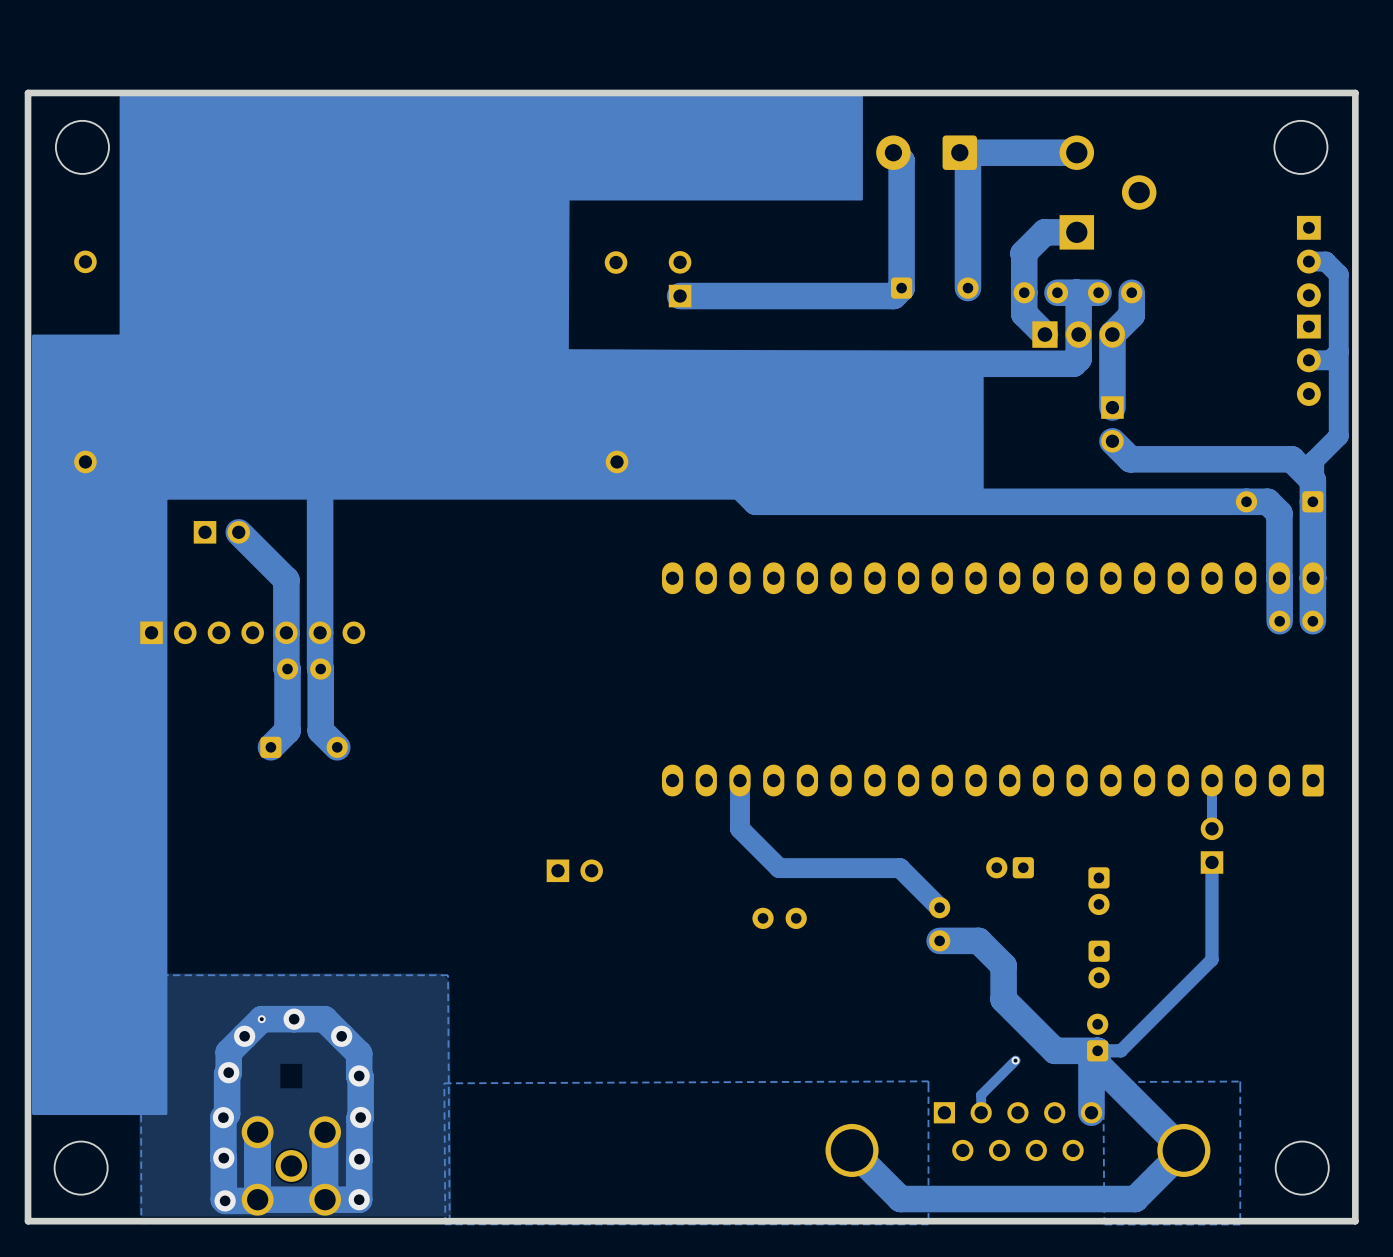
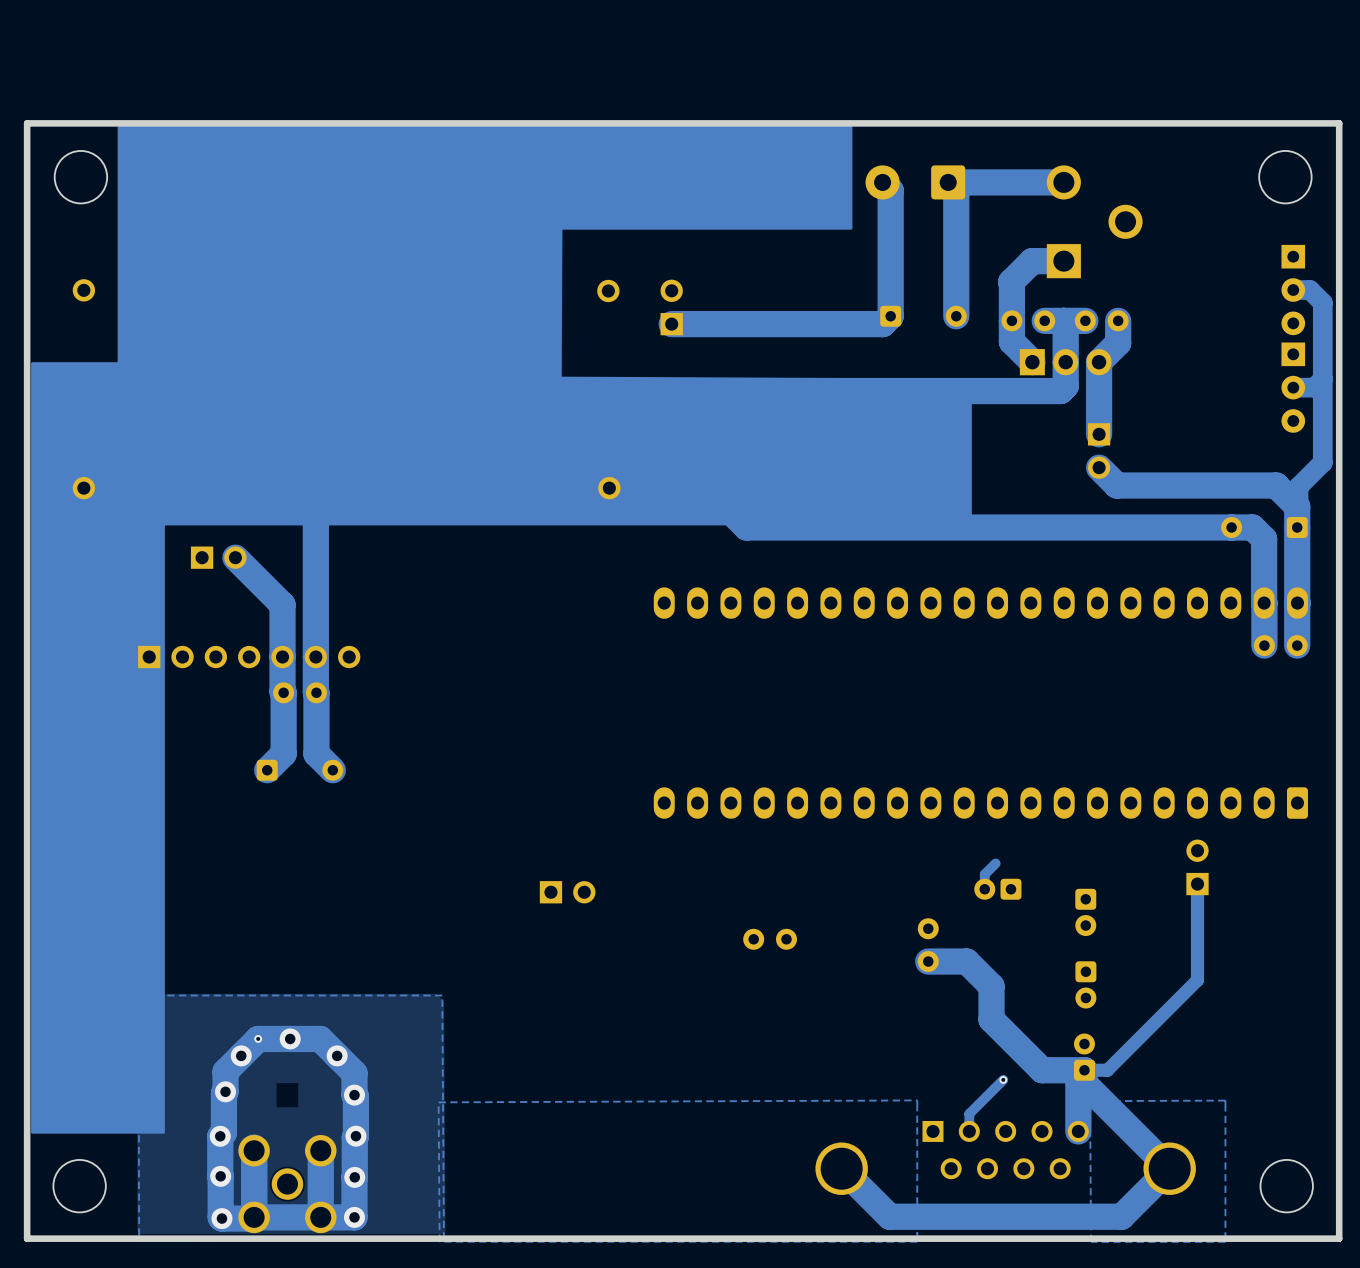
track: (740, 780) (740, 828) (779, 868) (900, 868) (939, 907) -> none
track: (1212, 780) (1212, 828) -> none
track: none -> (995, 863) (984, 874) (984, 889)

